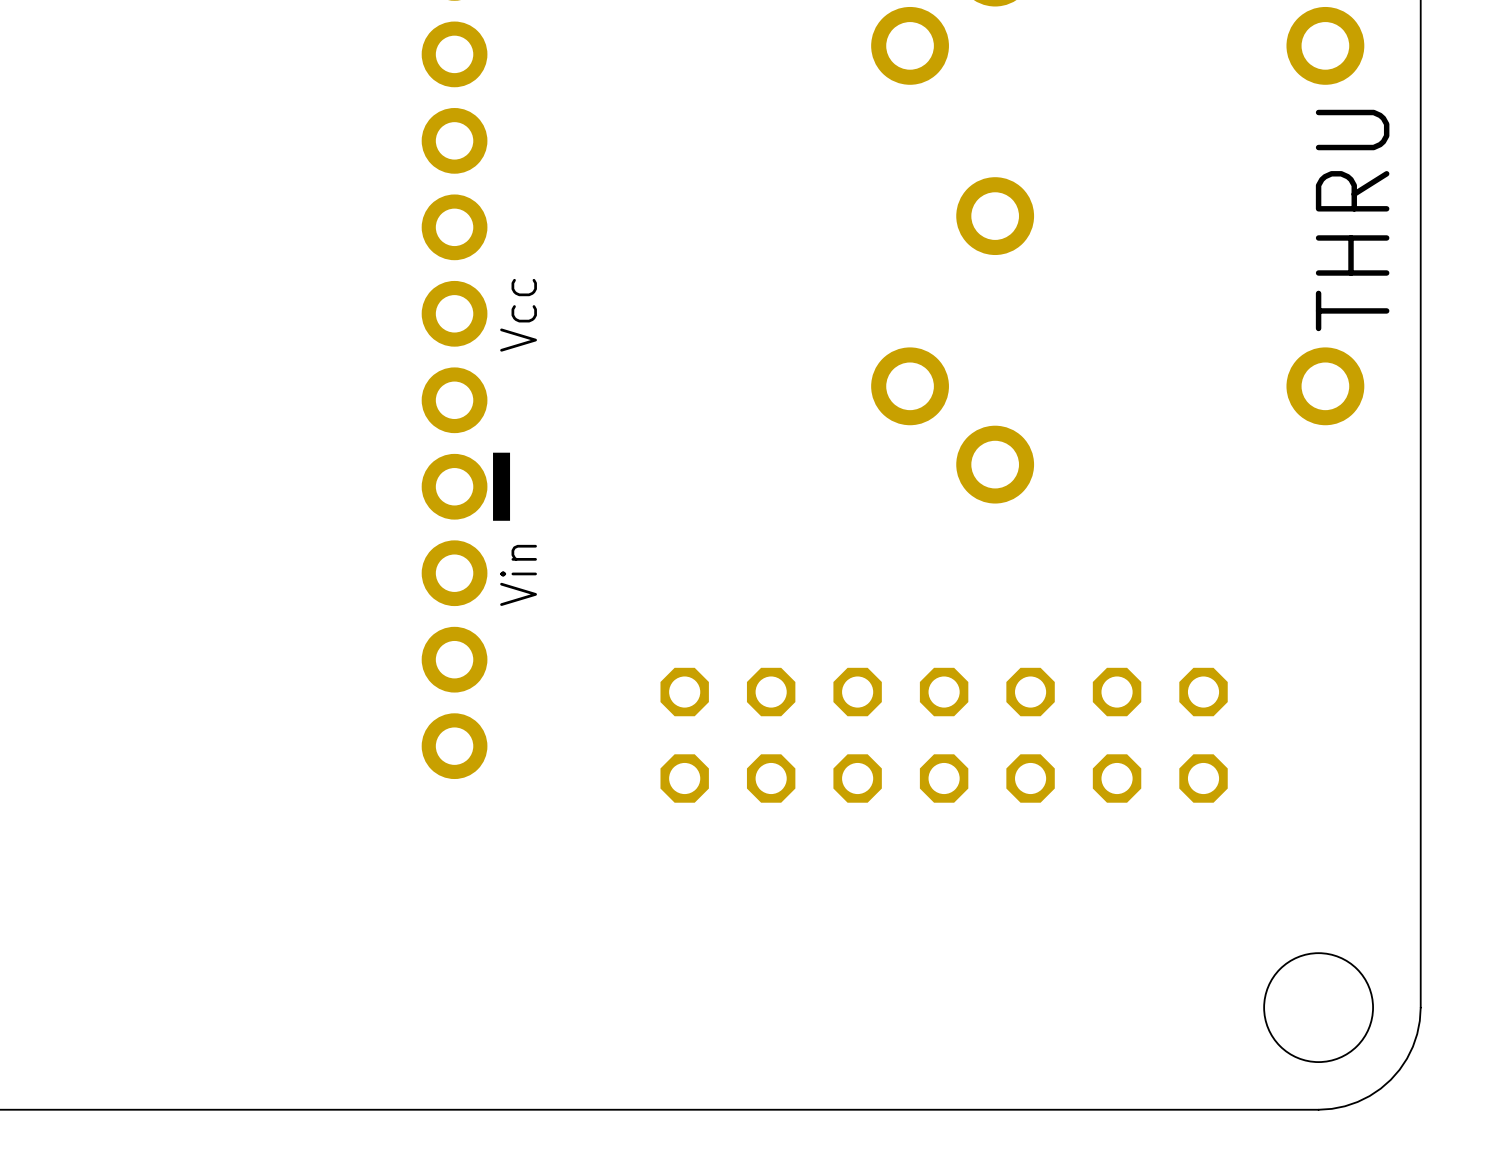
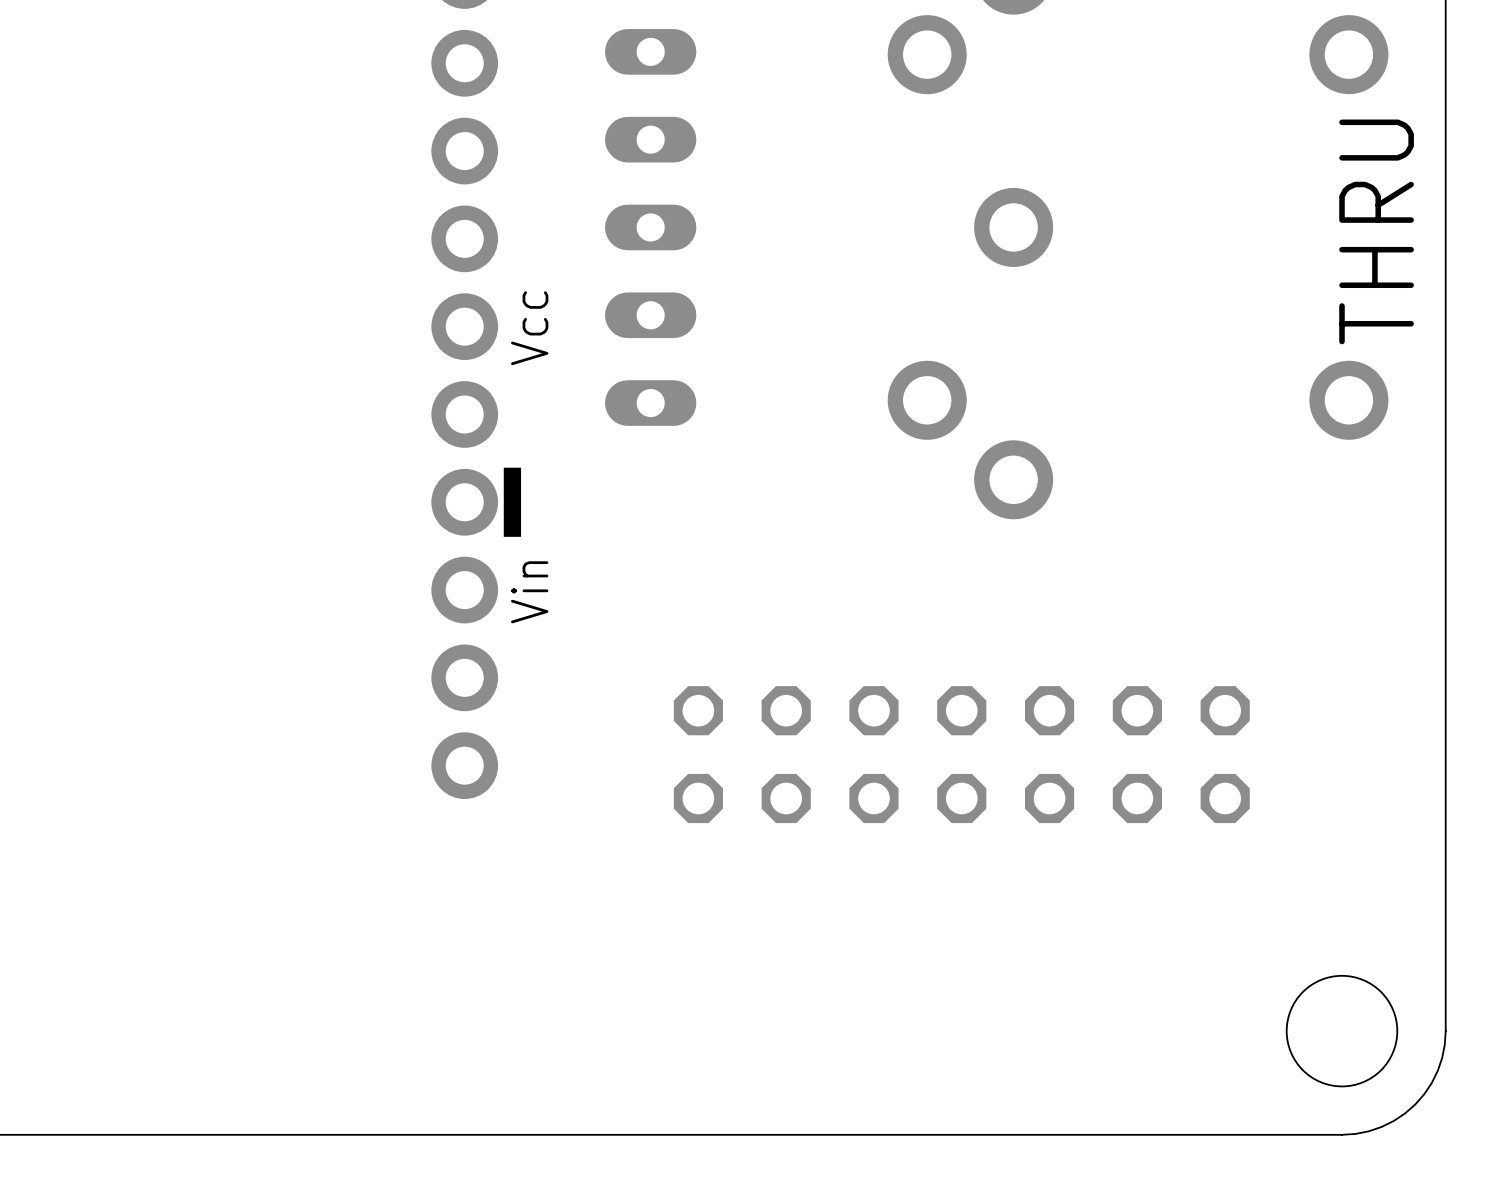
part: none -> (650, 227)

